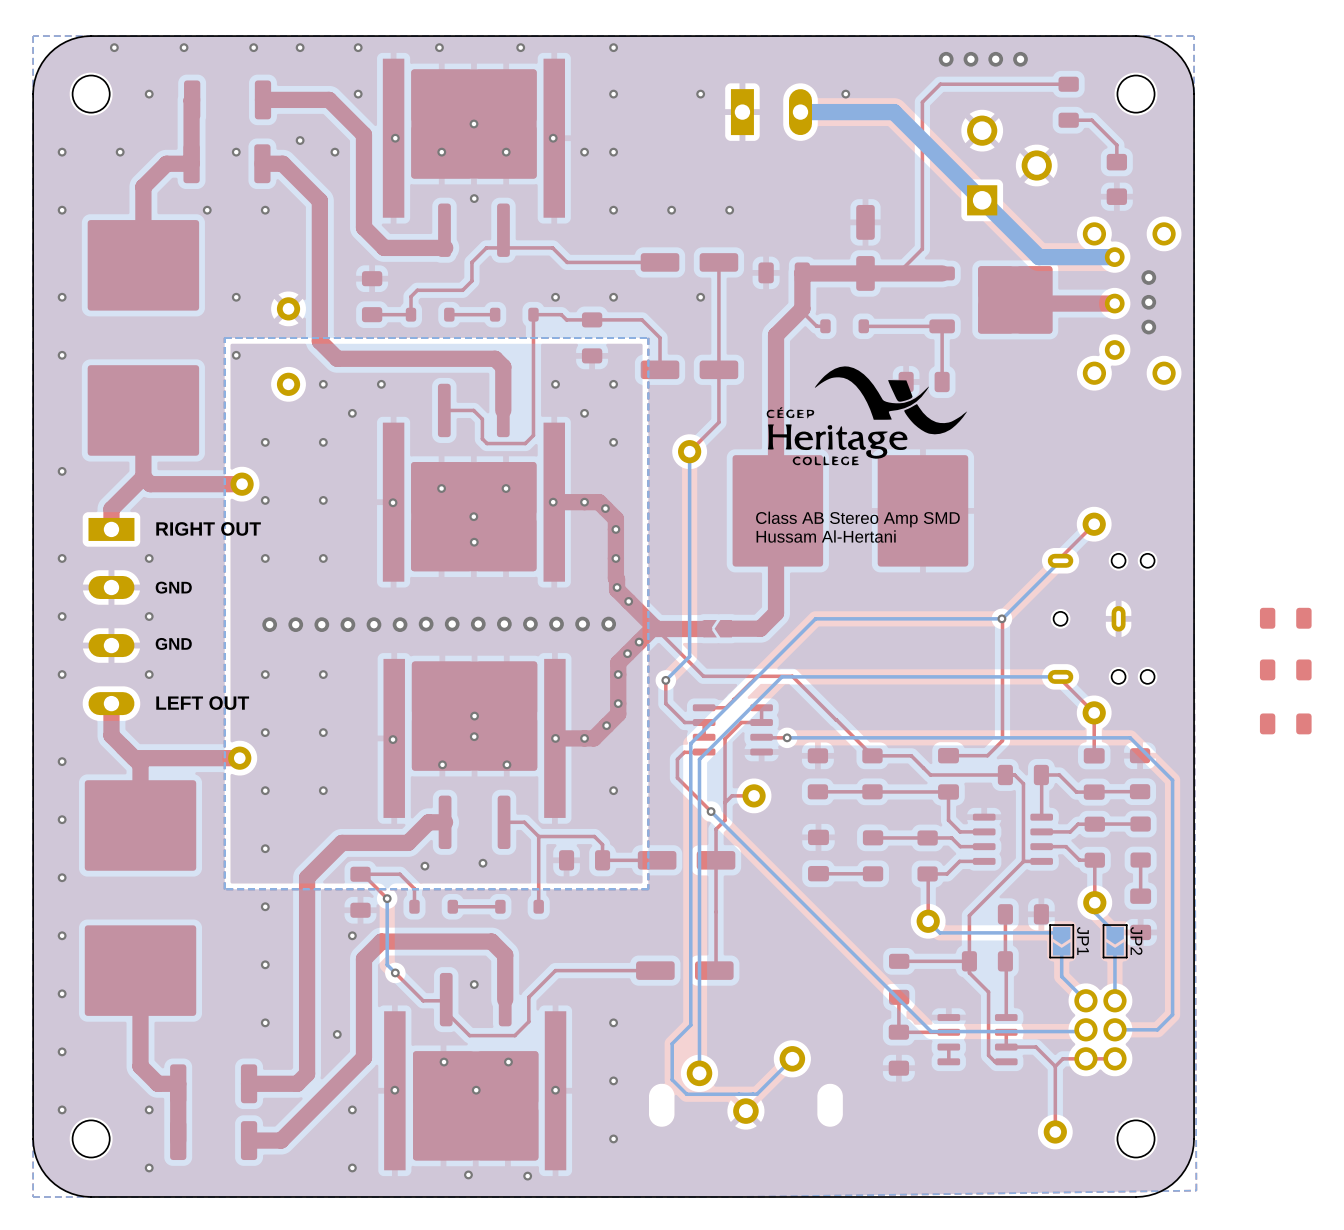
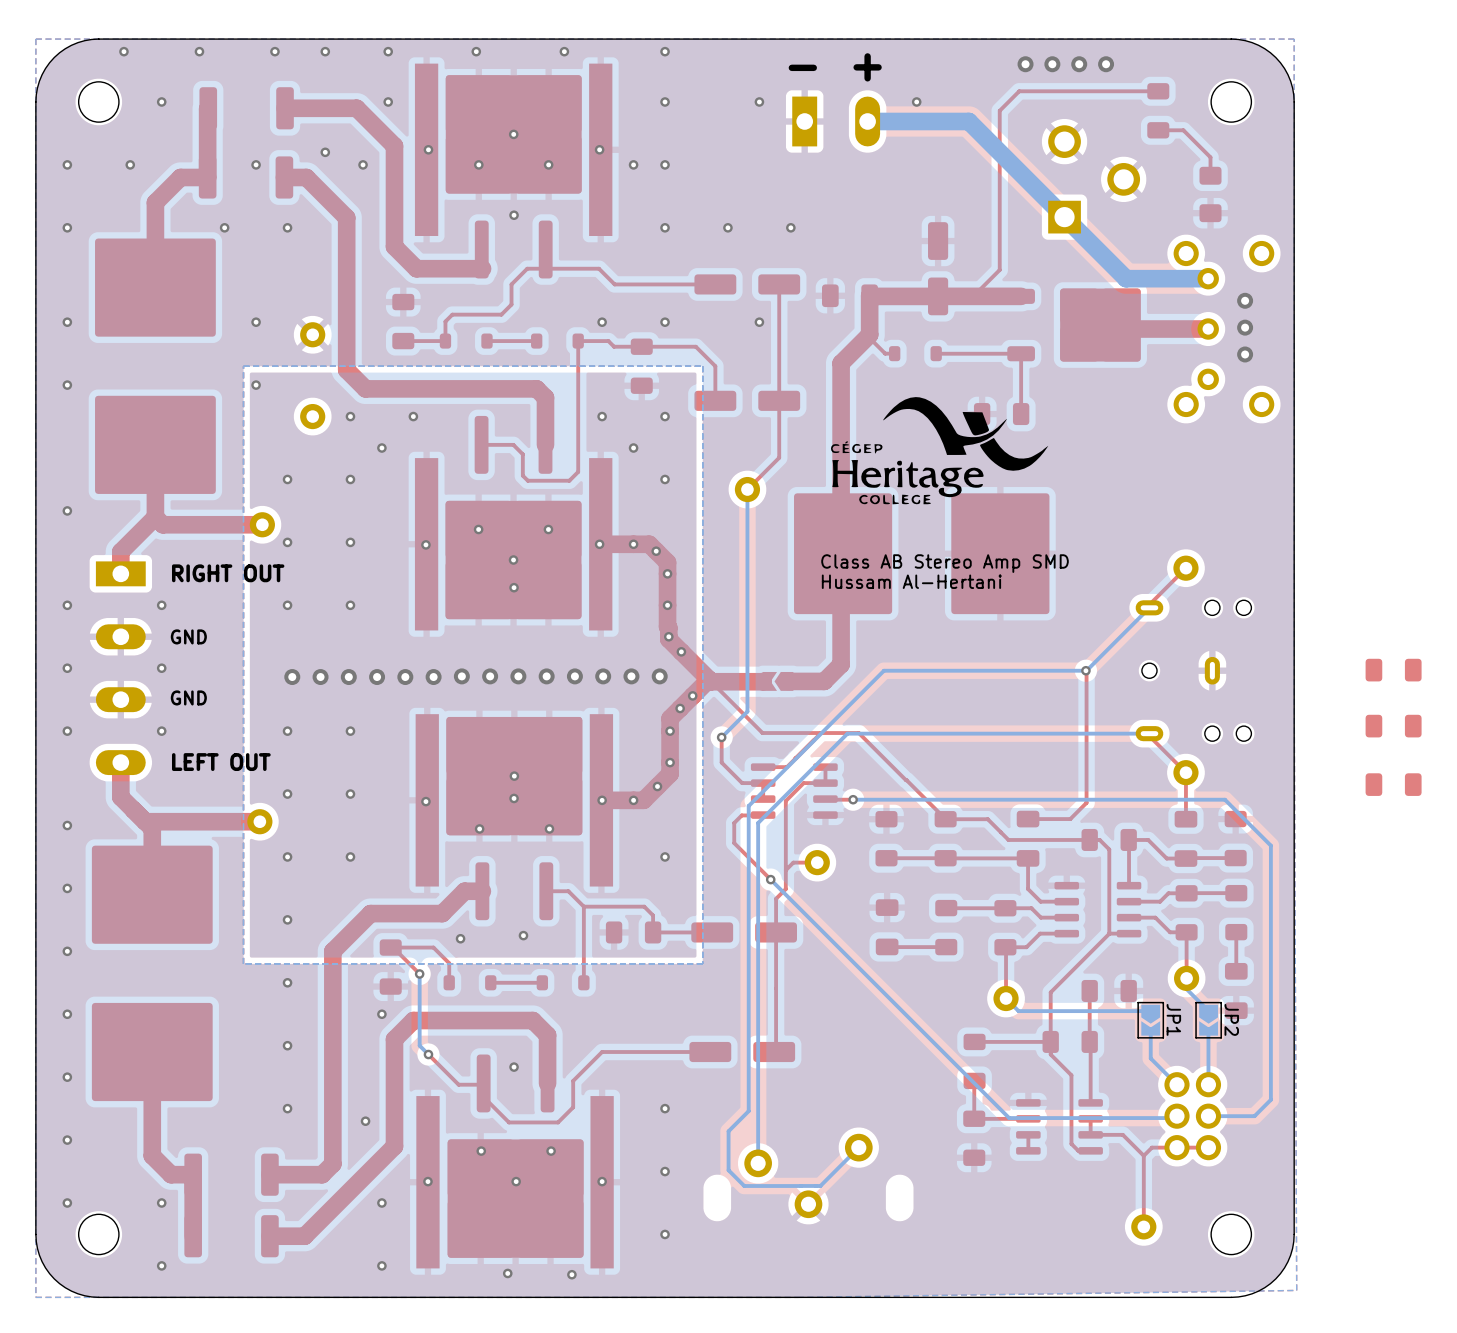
text: none -> + (867, 67)
text: none -> - (802, 67)

